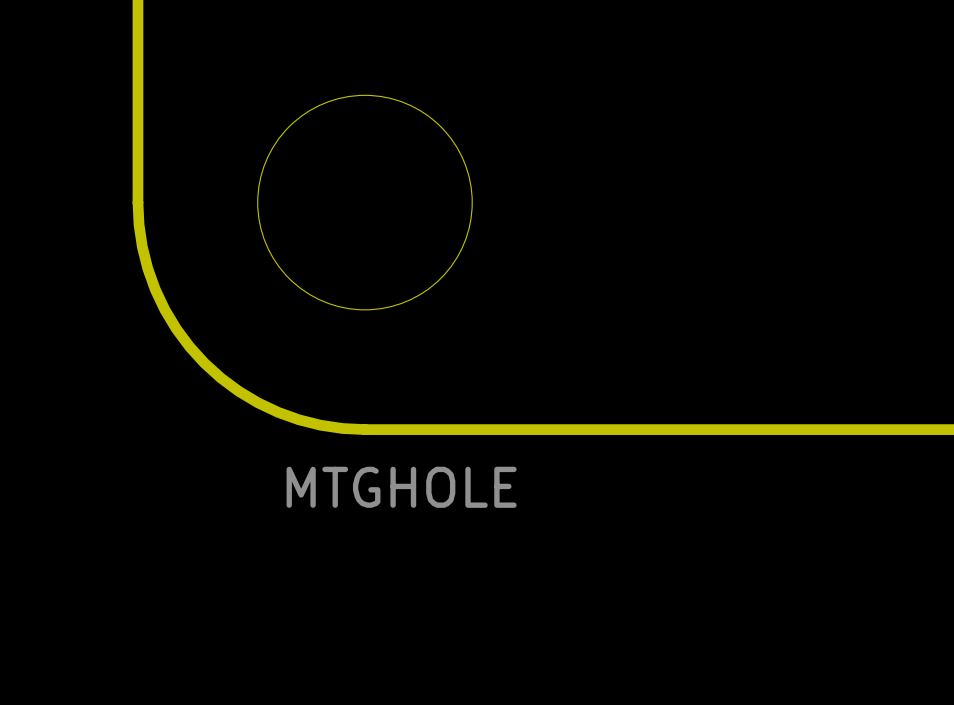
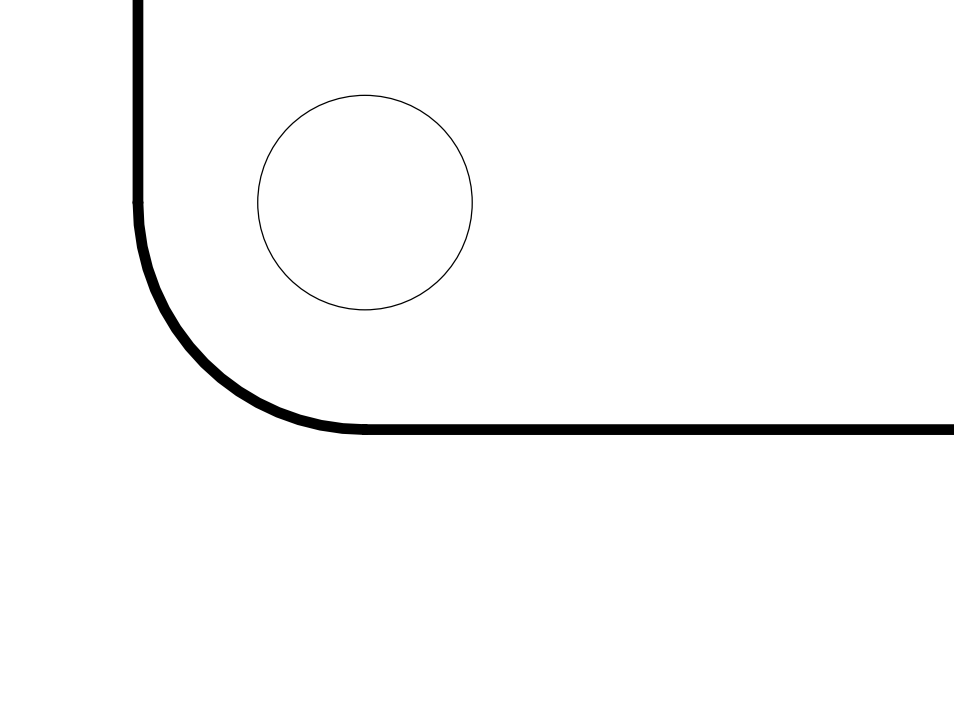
part value: MTGHOLE (401, 487) -> none

